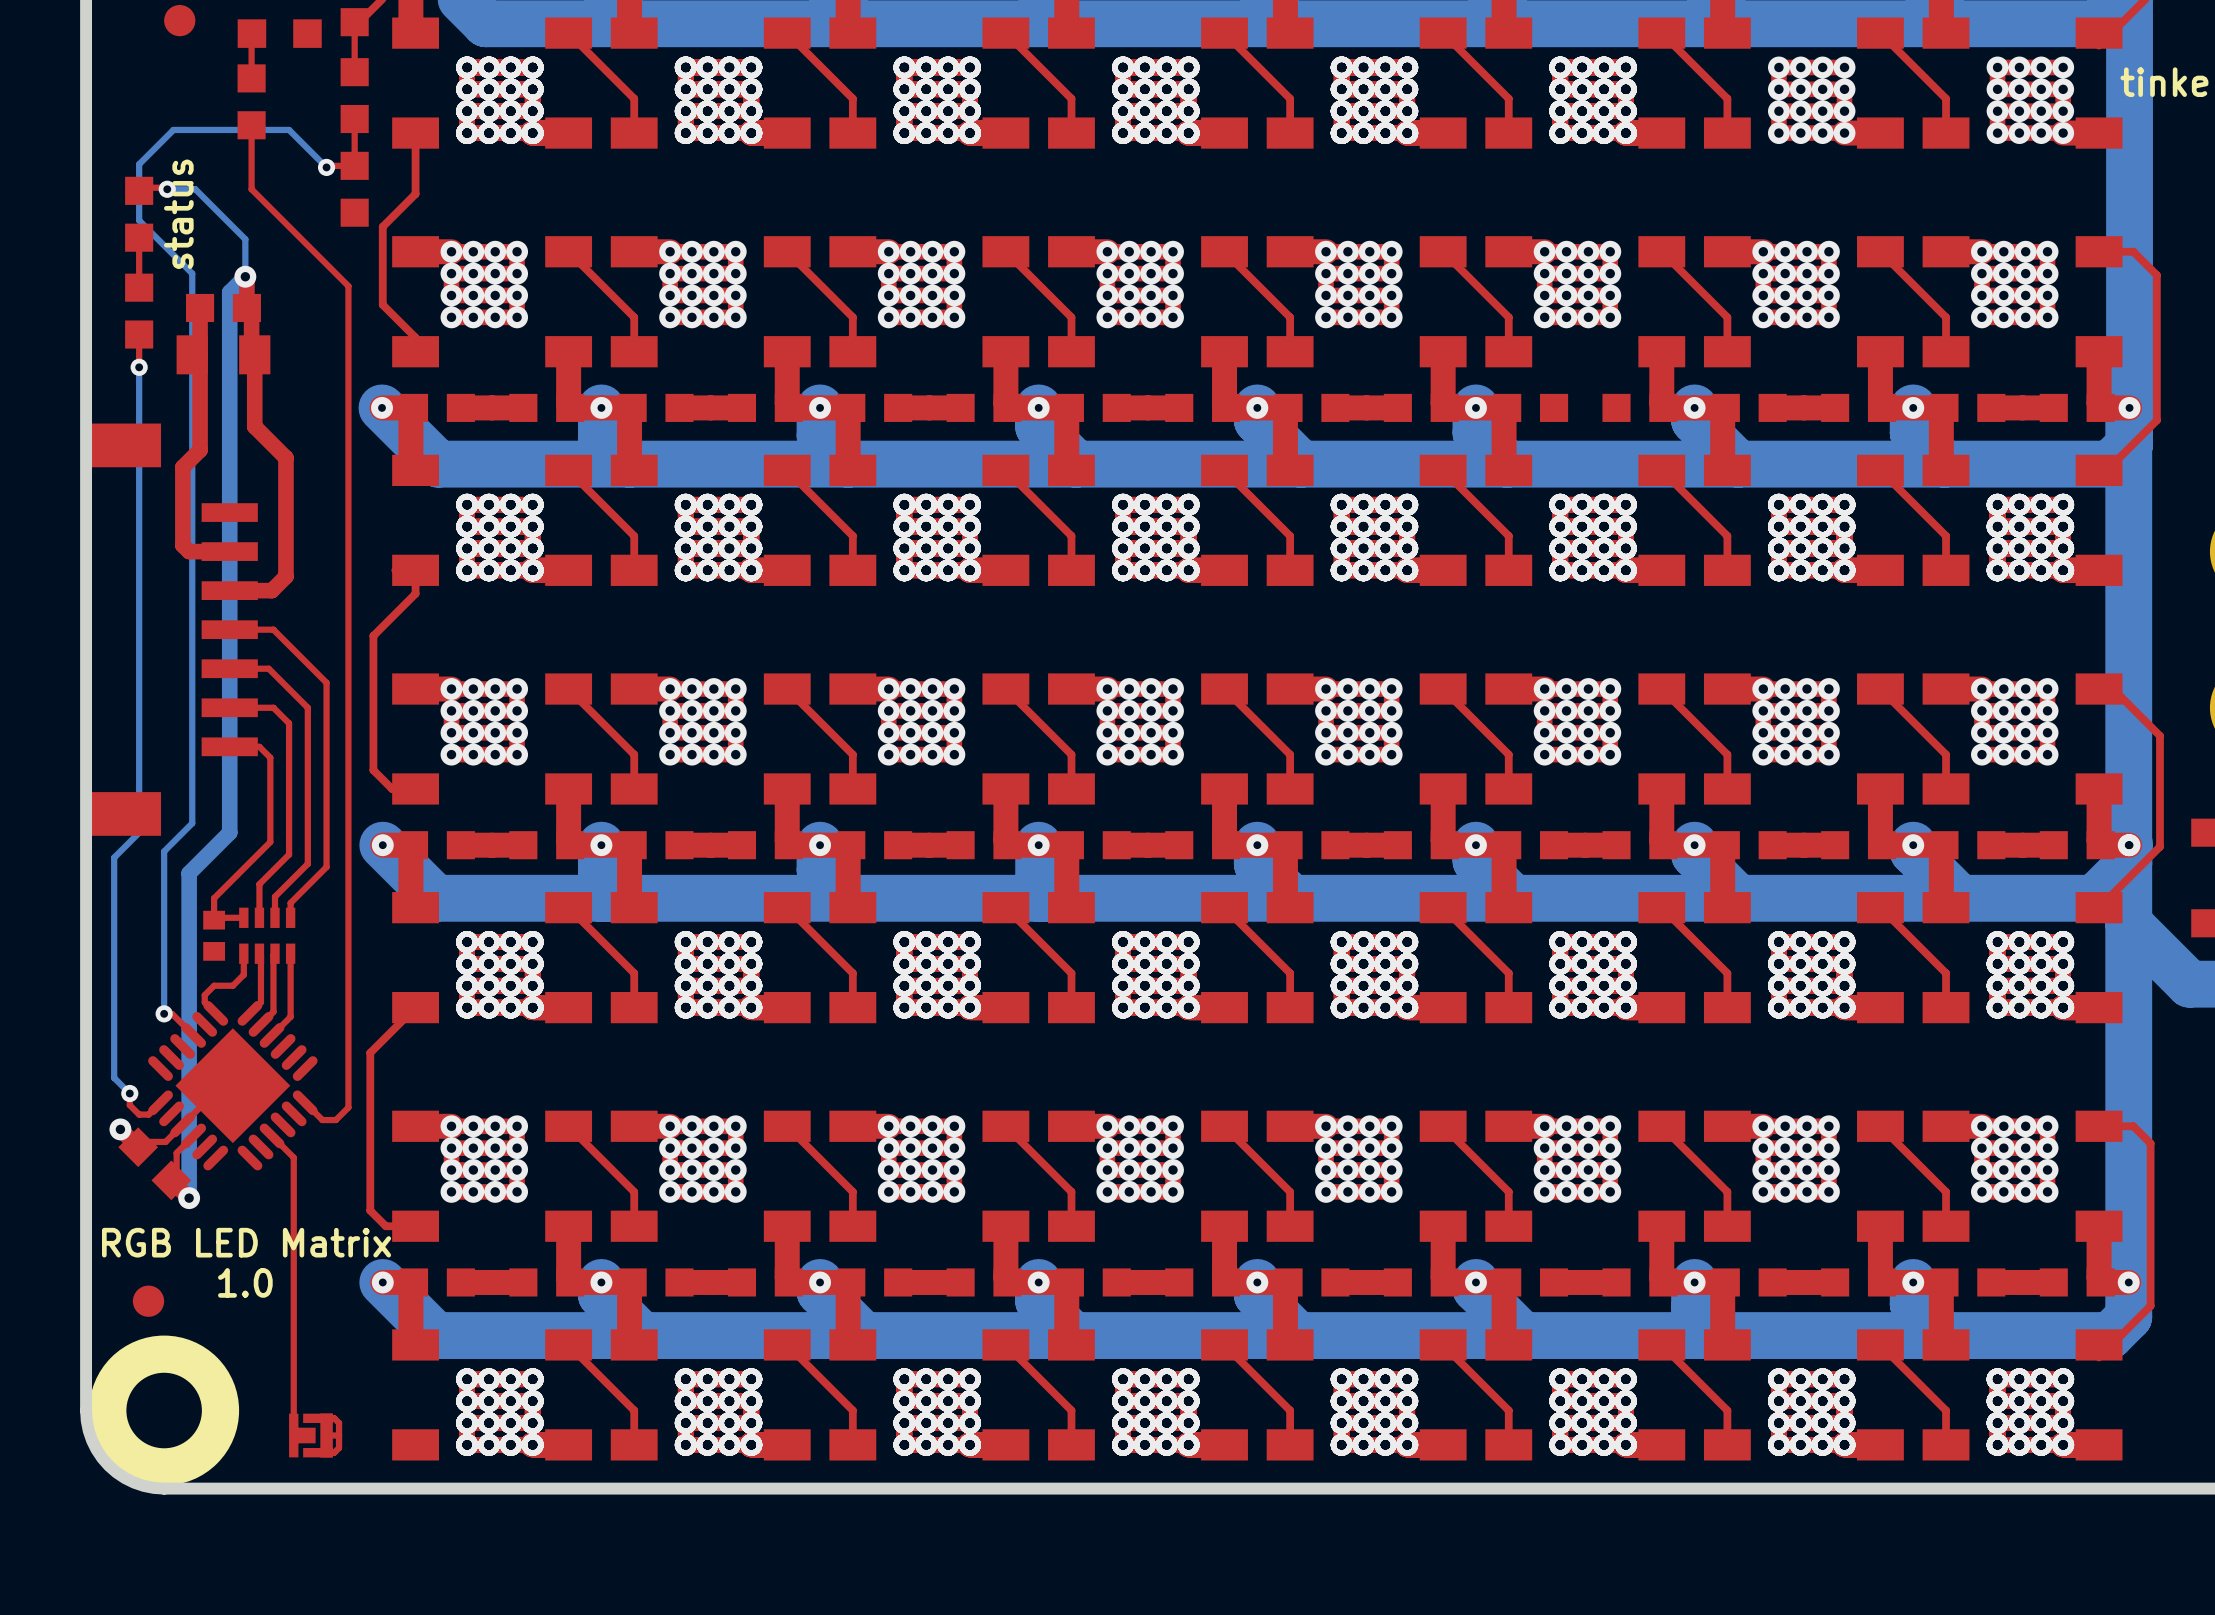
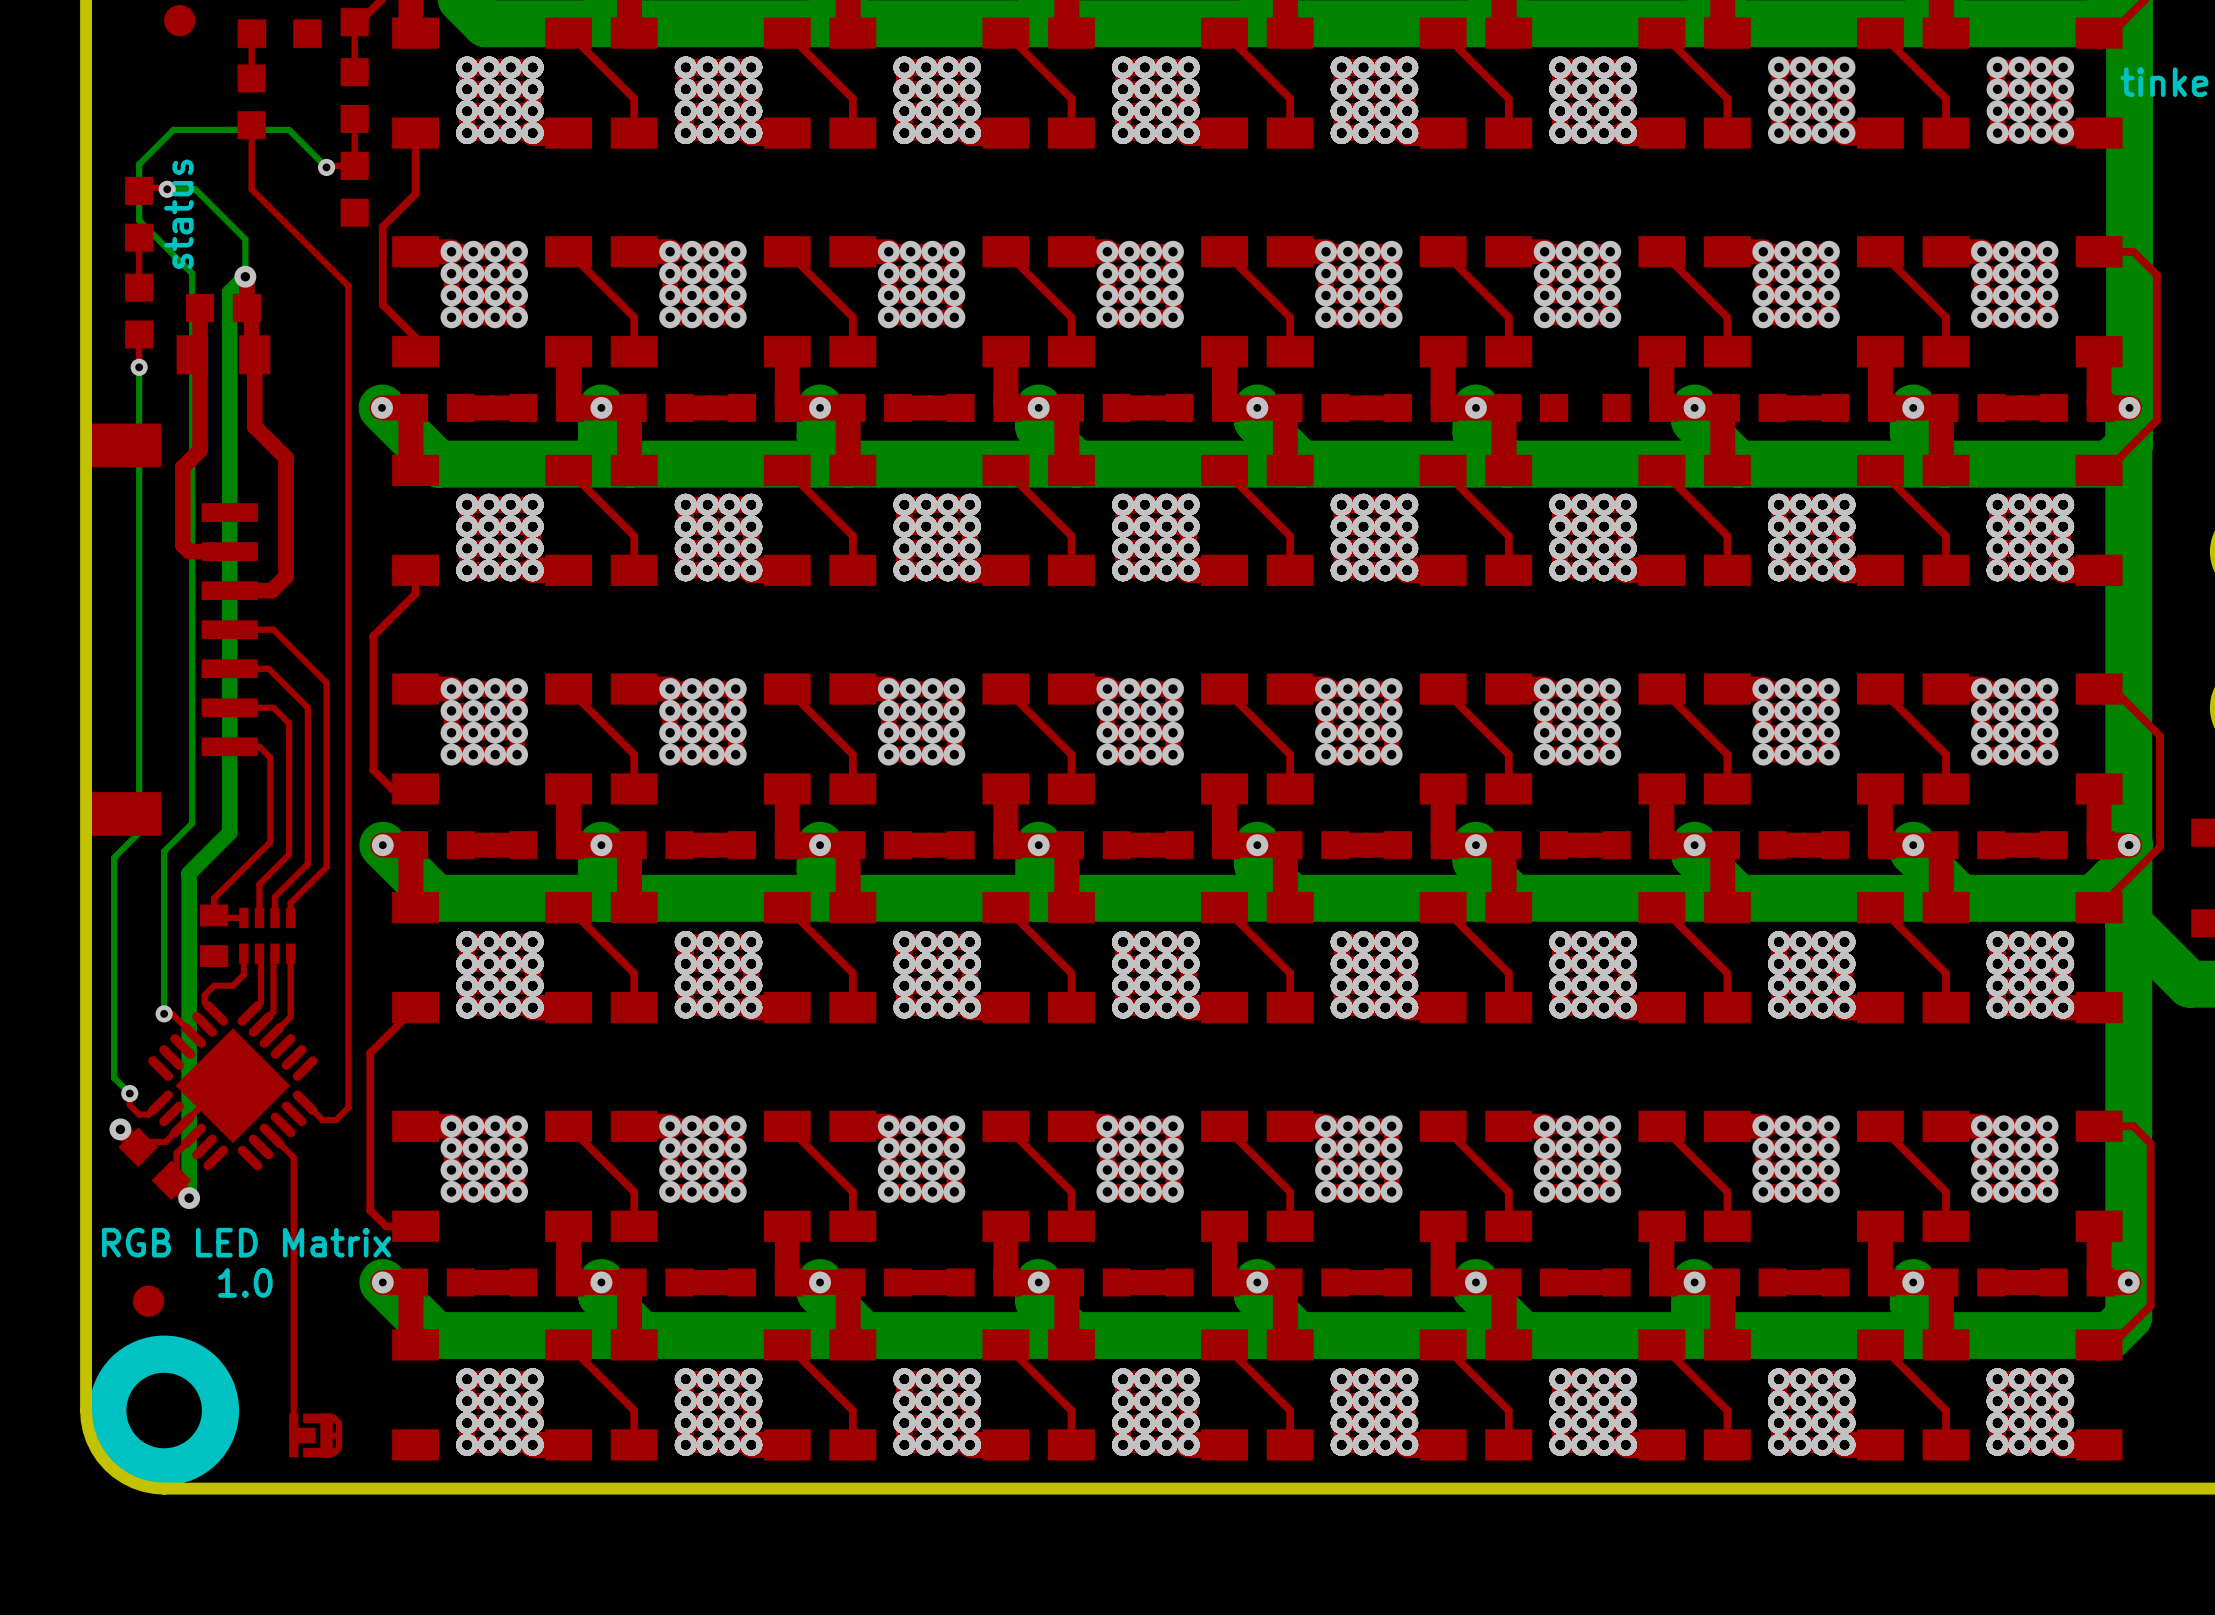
part footprint: [203, 910, 226, 961] -> [200, 904, 229, 968]

